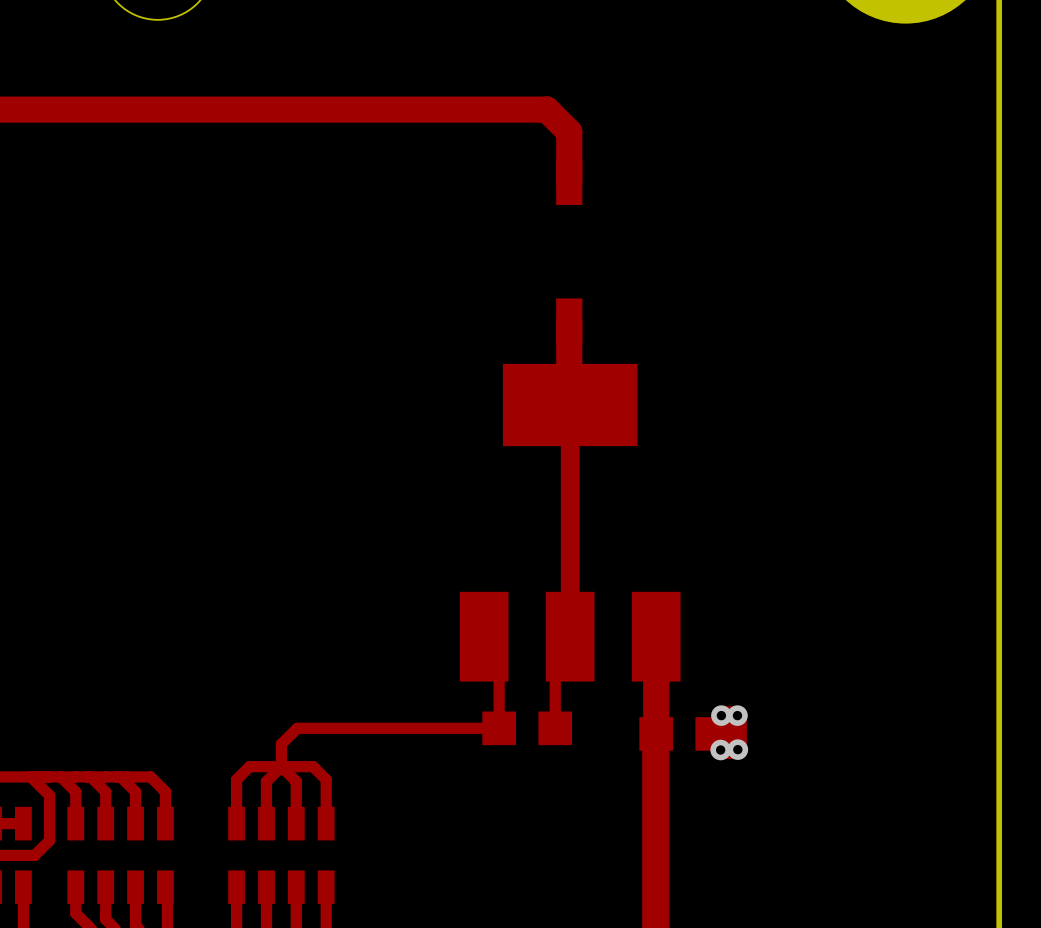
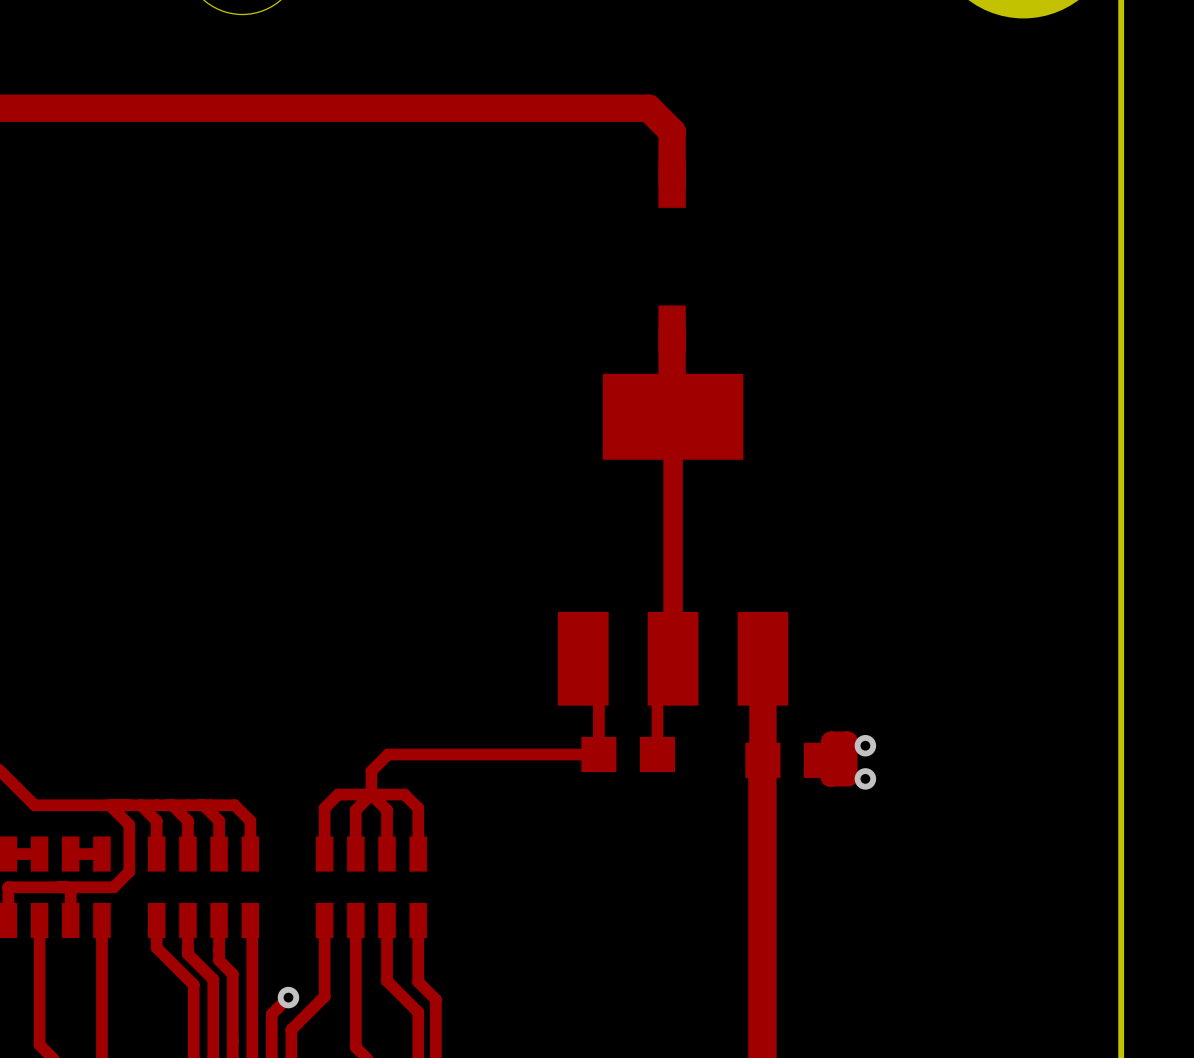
via: (721, 715) -> none
via position: (737, 715) -> (865, 745)
via position: (737, 749) -> (865, 778)
via: (720, 750) -> none

